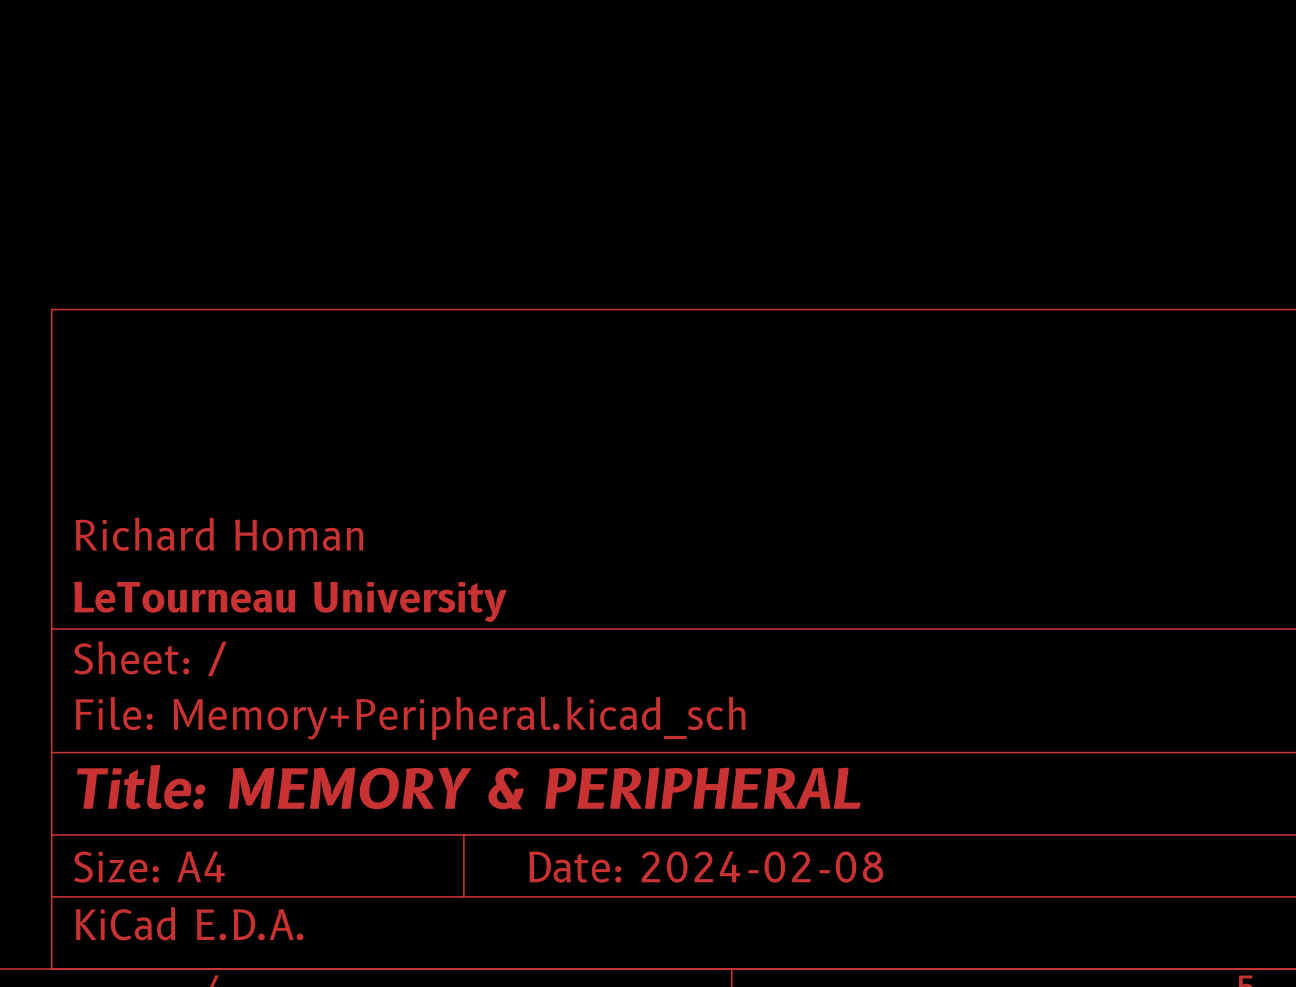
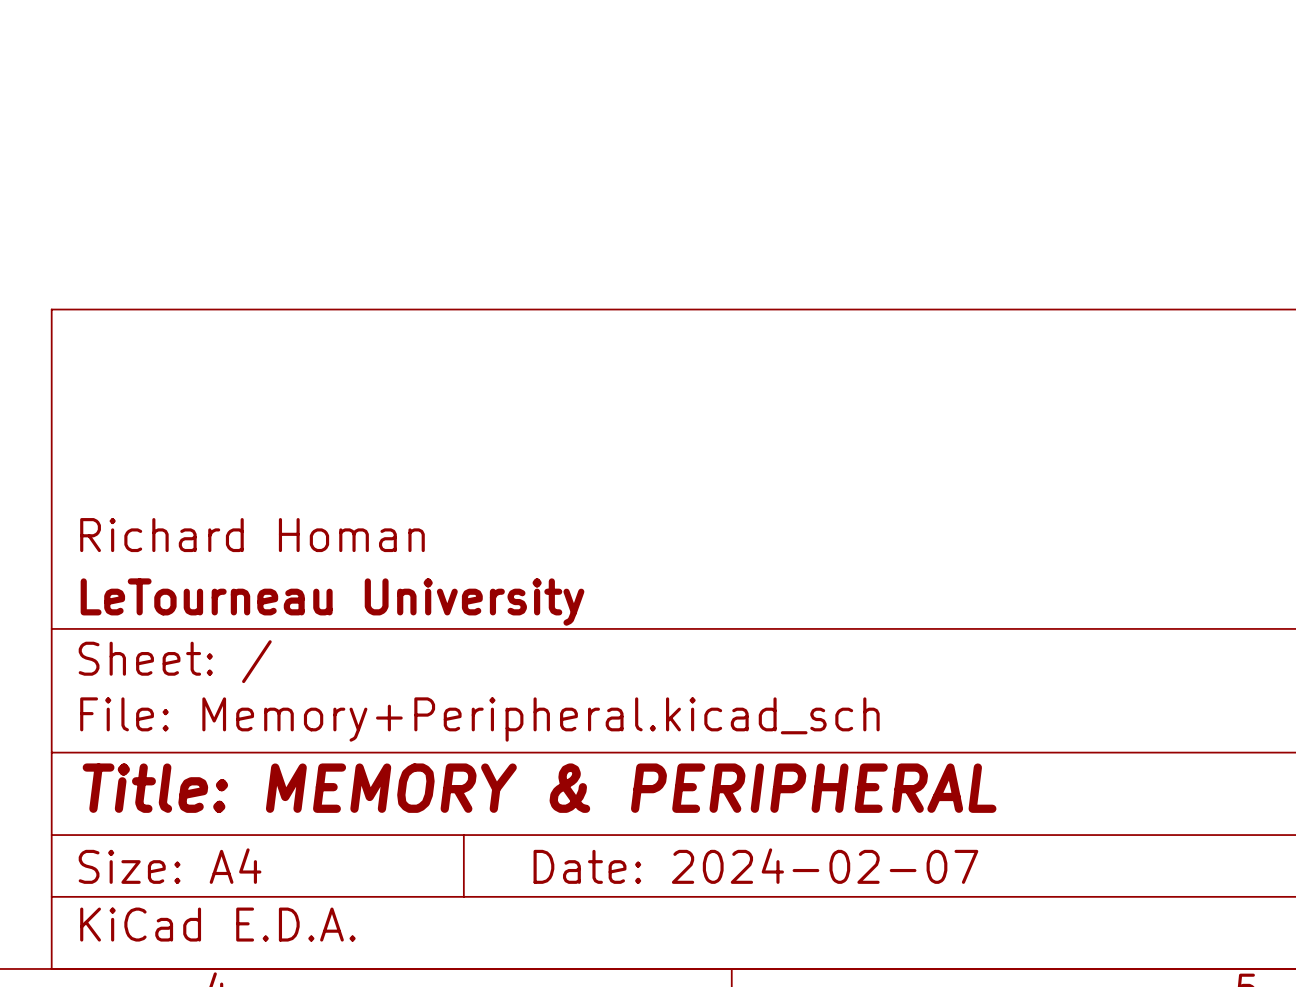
title block: Date: 2024-02-08 (706, 867) -> Date: 2024-02-07 (755, 866)

